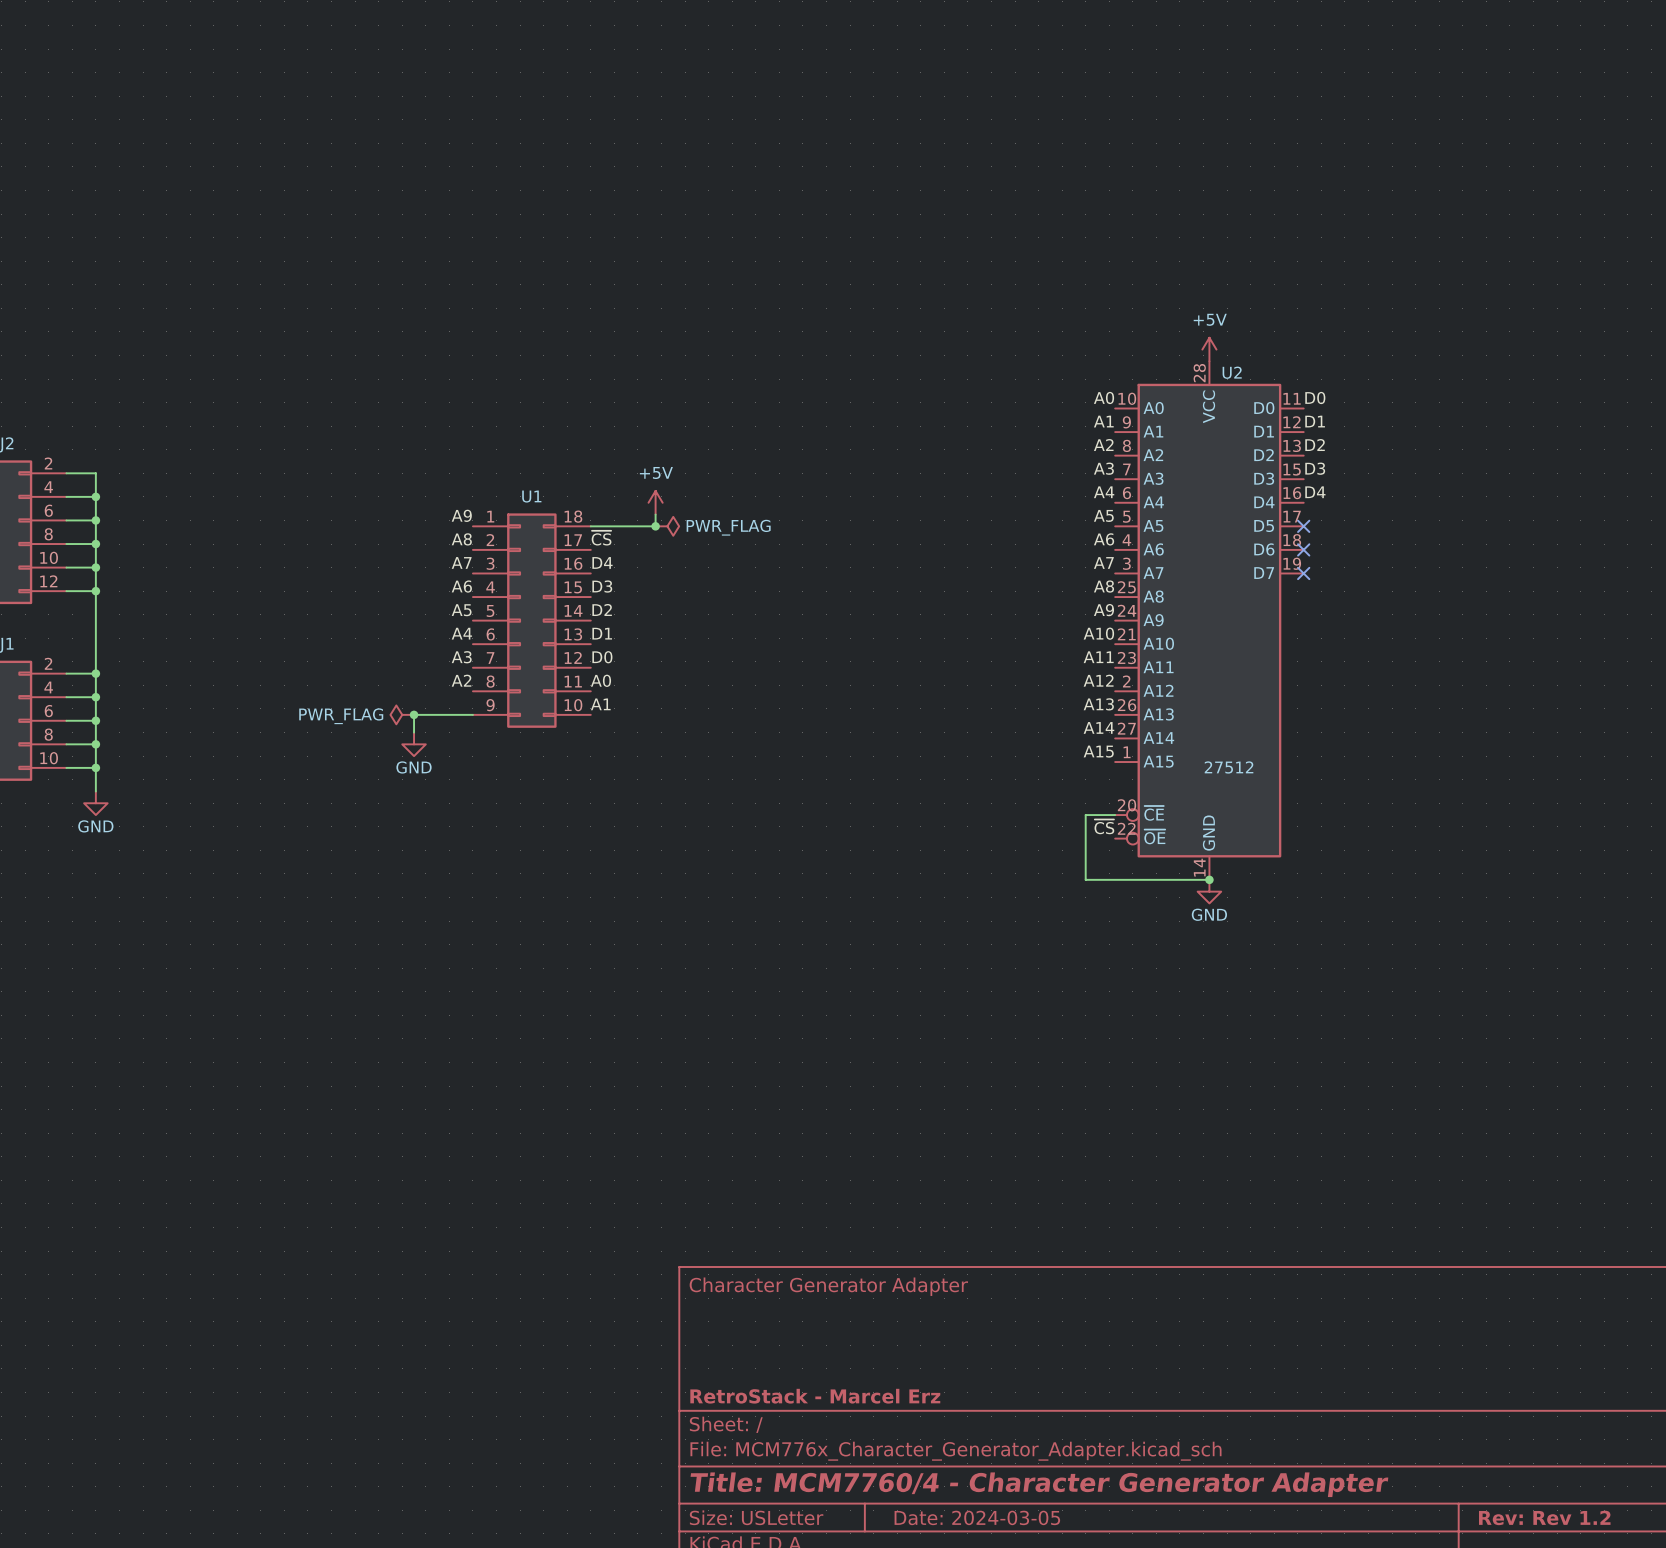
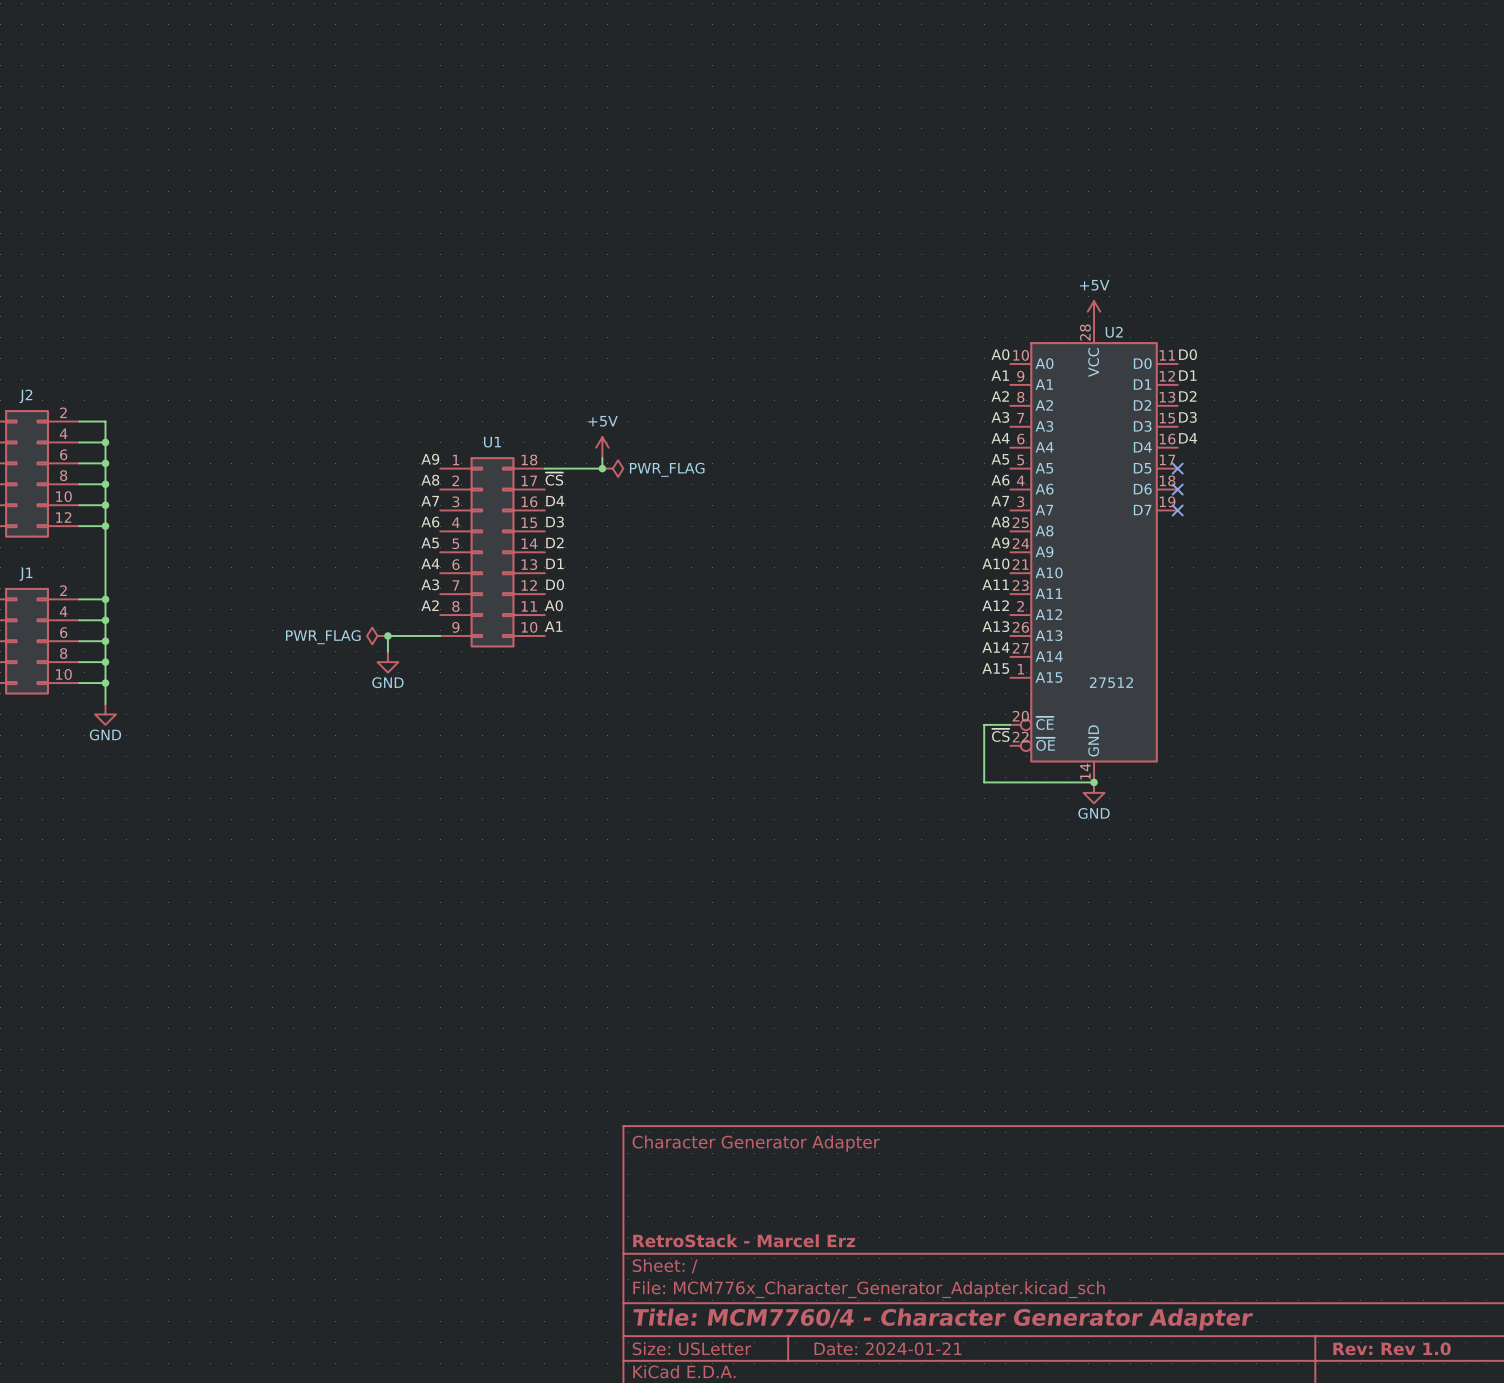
title block: Date: 2024-03-05 (977, 1517) -> Date: 2024-01-21 (887, 1348)
title block: Rev: Rev 1.2 (1544, 1517) -> Rev: Rev 1.0 (1392, 1348)

